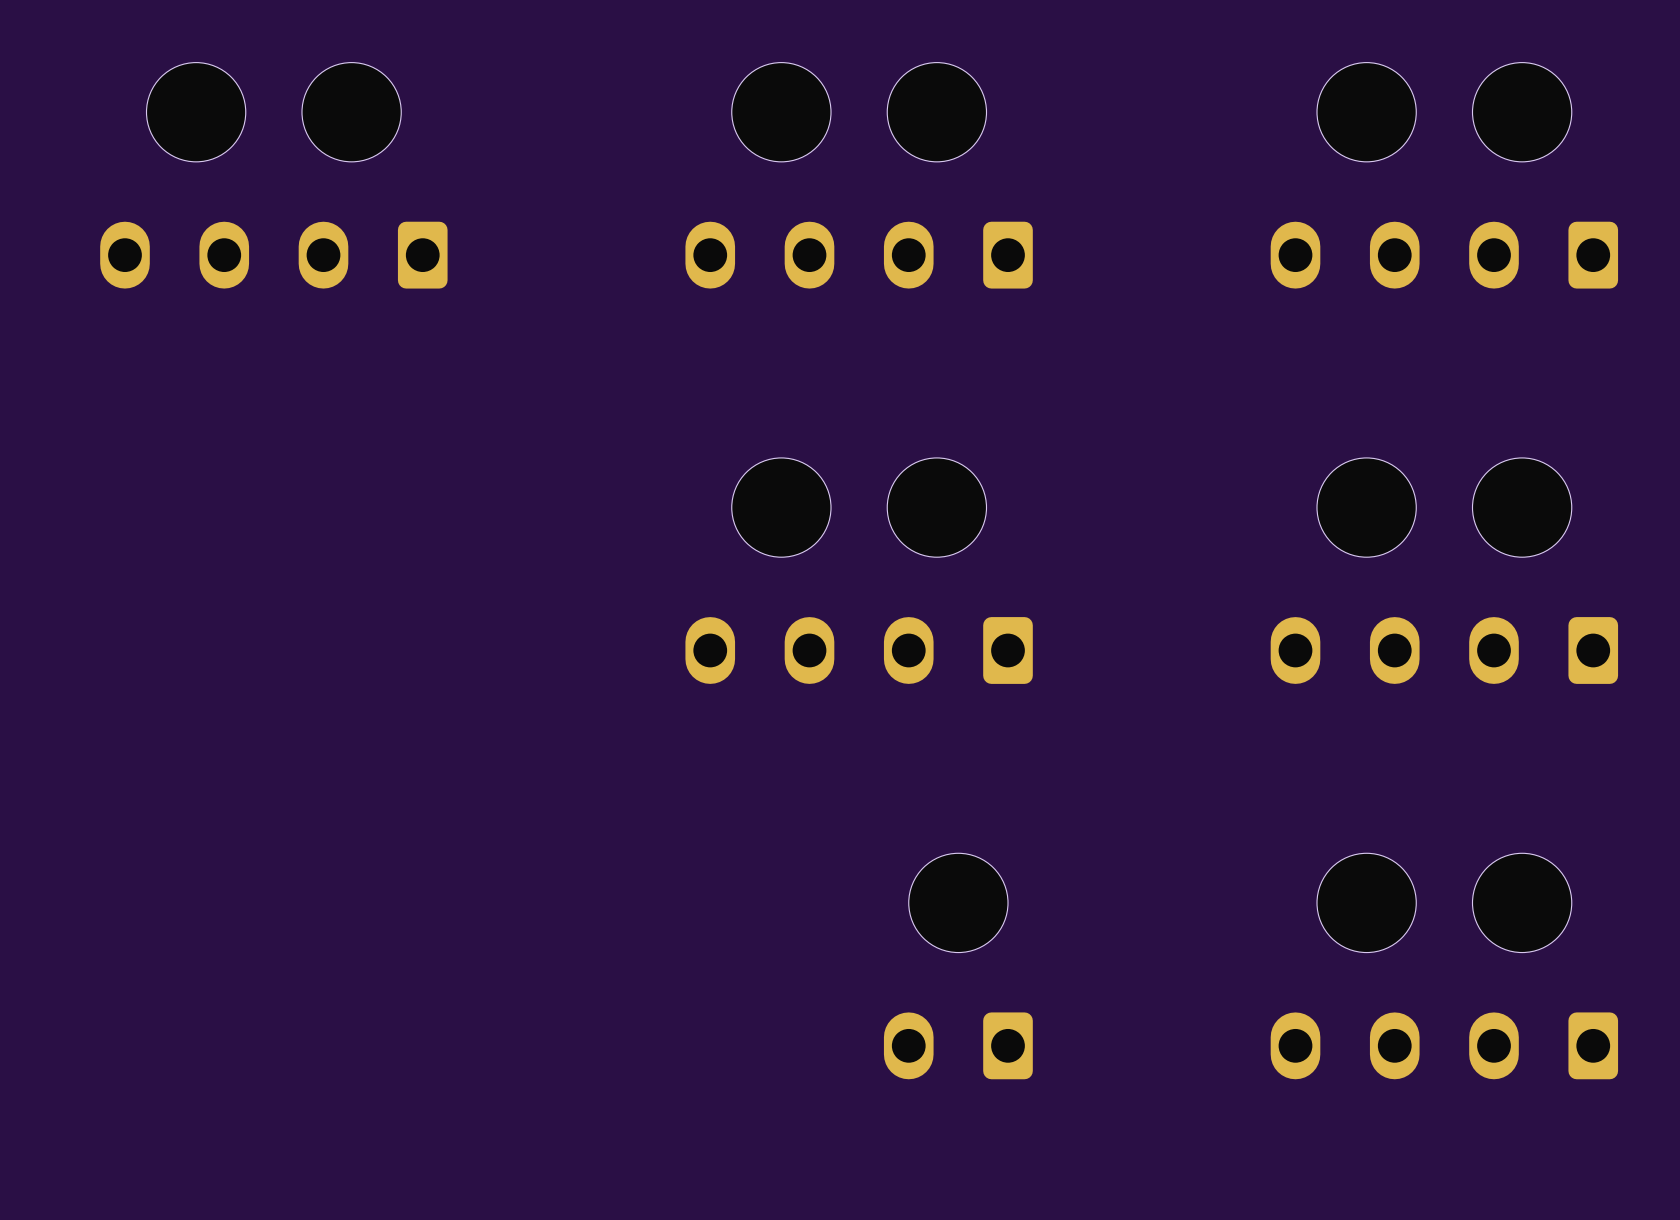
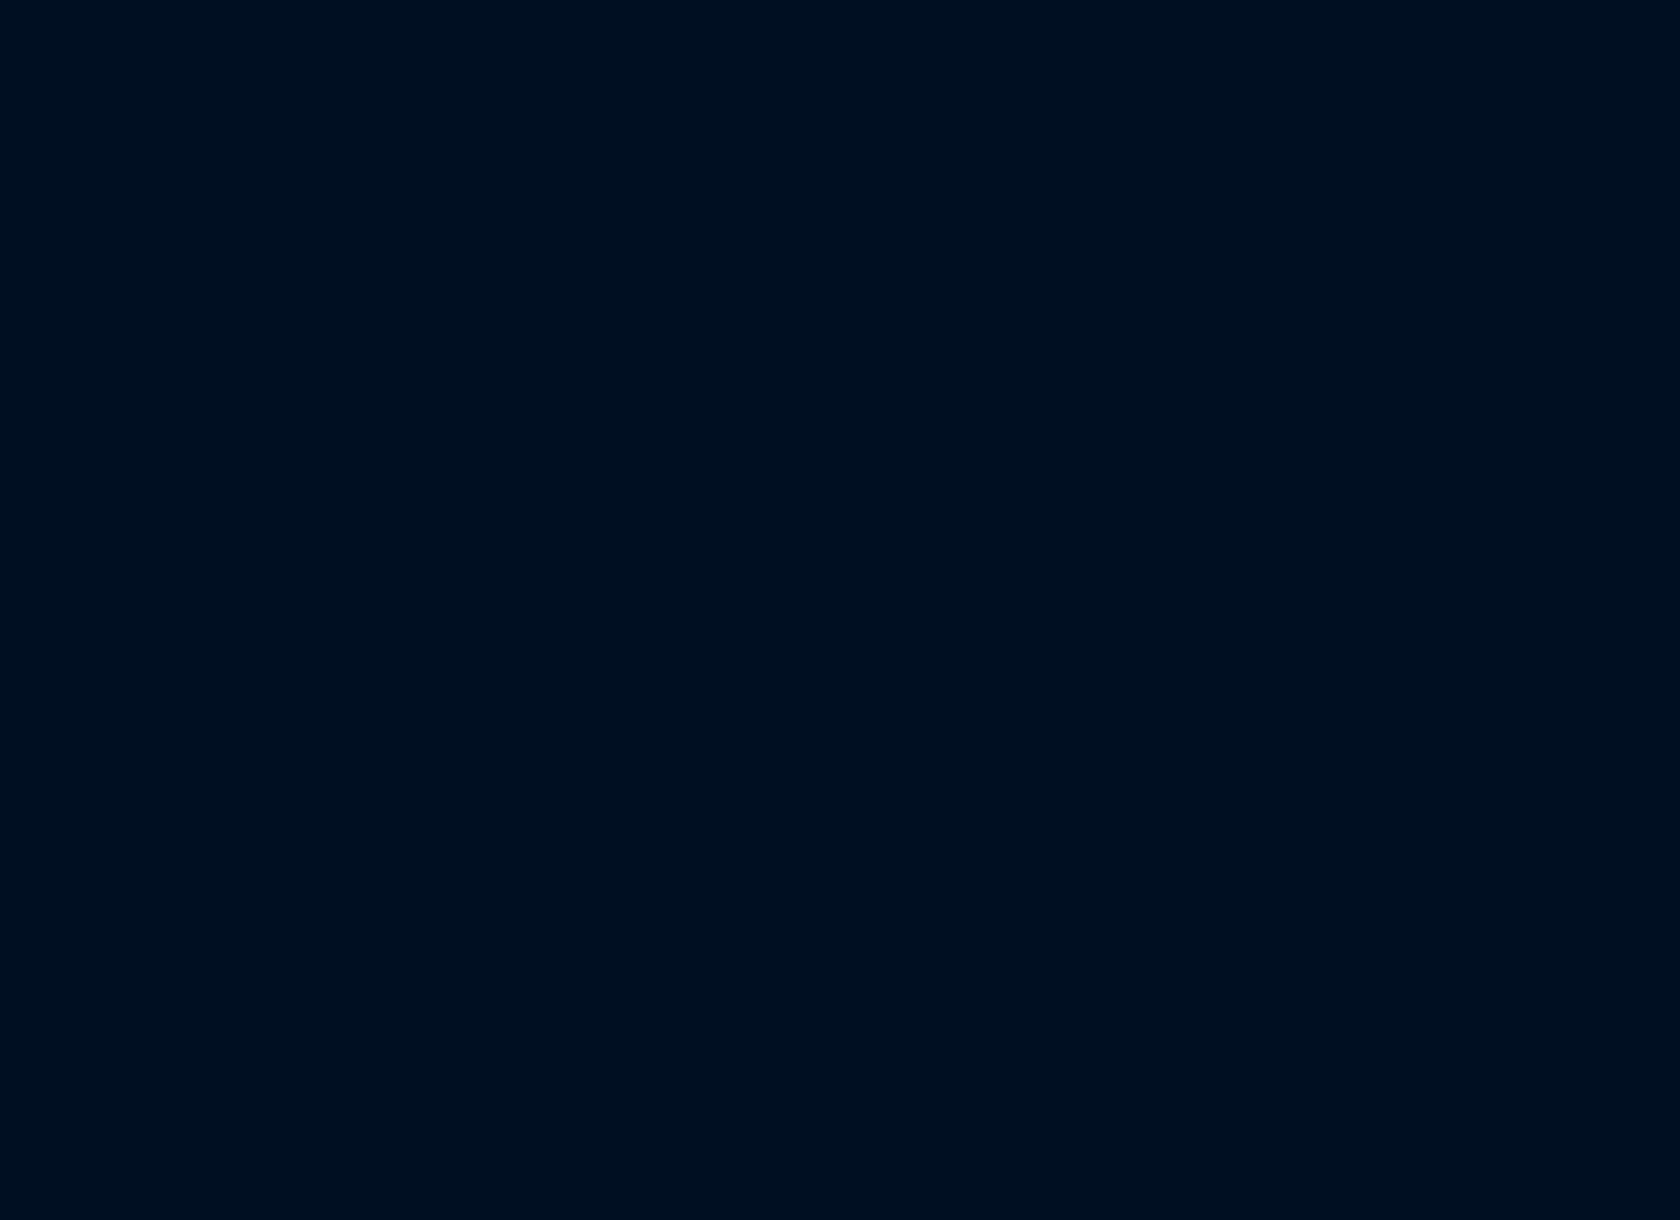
part: (273, 175) -> none
part: (859, 175) -> none
part: (1444, 175) -> none
part: (859, 570) -> none
part: (1444, 570) -> none
part: (958, 966) -> none
part: (1444, 966) -> none

